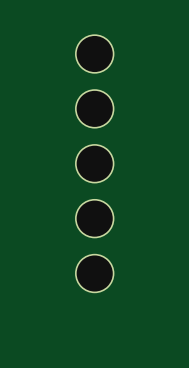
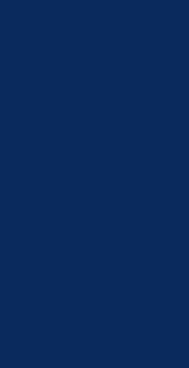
part: (94, 54) -> none
part: (94, 108) -> none
part: (94, 163) -> none
part: (94, 218) -> none
part: (94, 273) -> none

